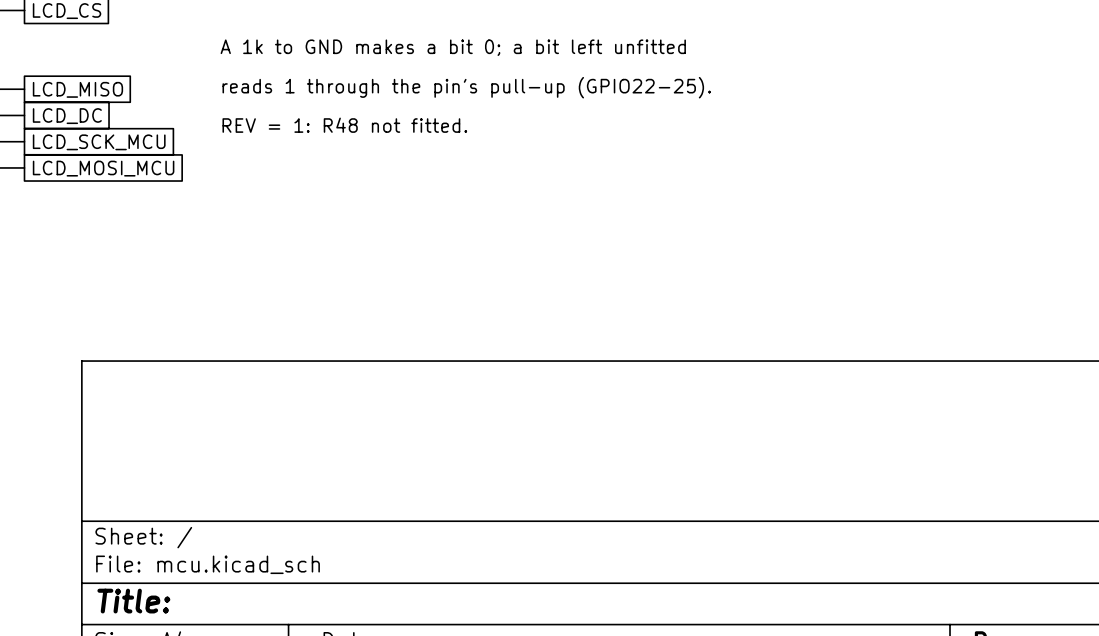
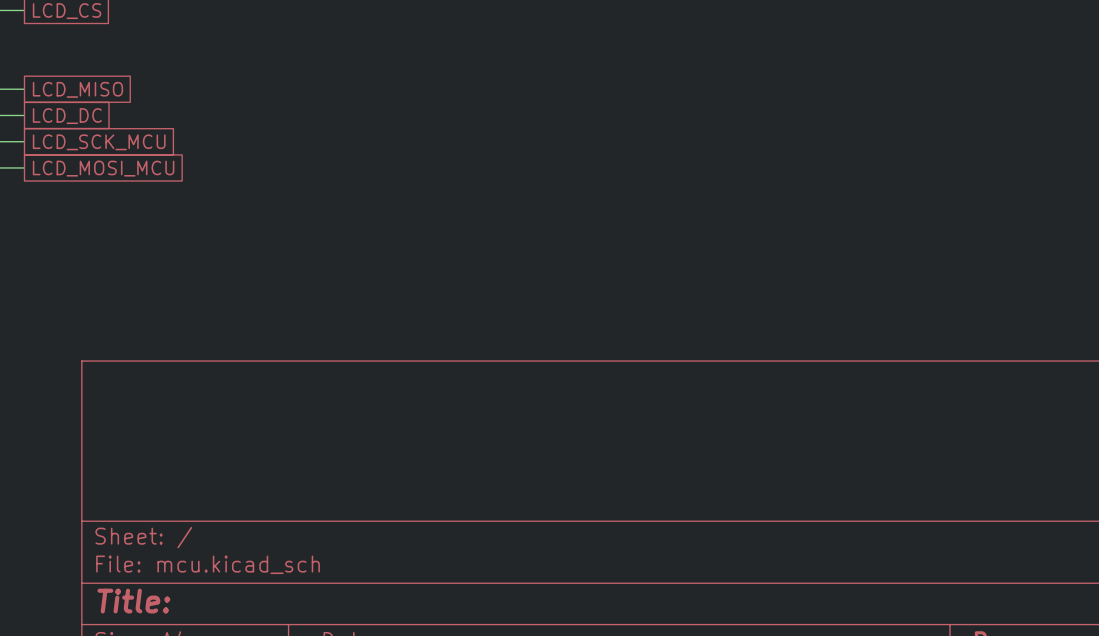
text: A 1k to GND makes a bit 0; a bit left unfitted (453, 47) -> none
text: reads 1 through the pin's pull-up (GPIO22-25). (466, 87) -> none
text: REV = 1: R48 not fitted. (344, 125) -> none

